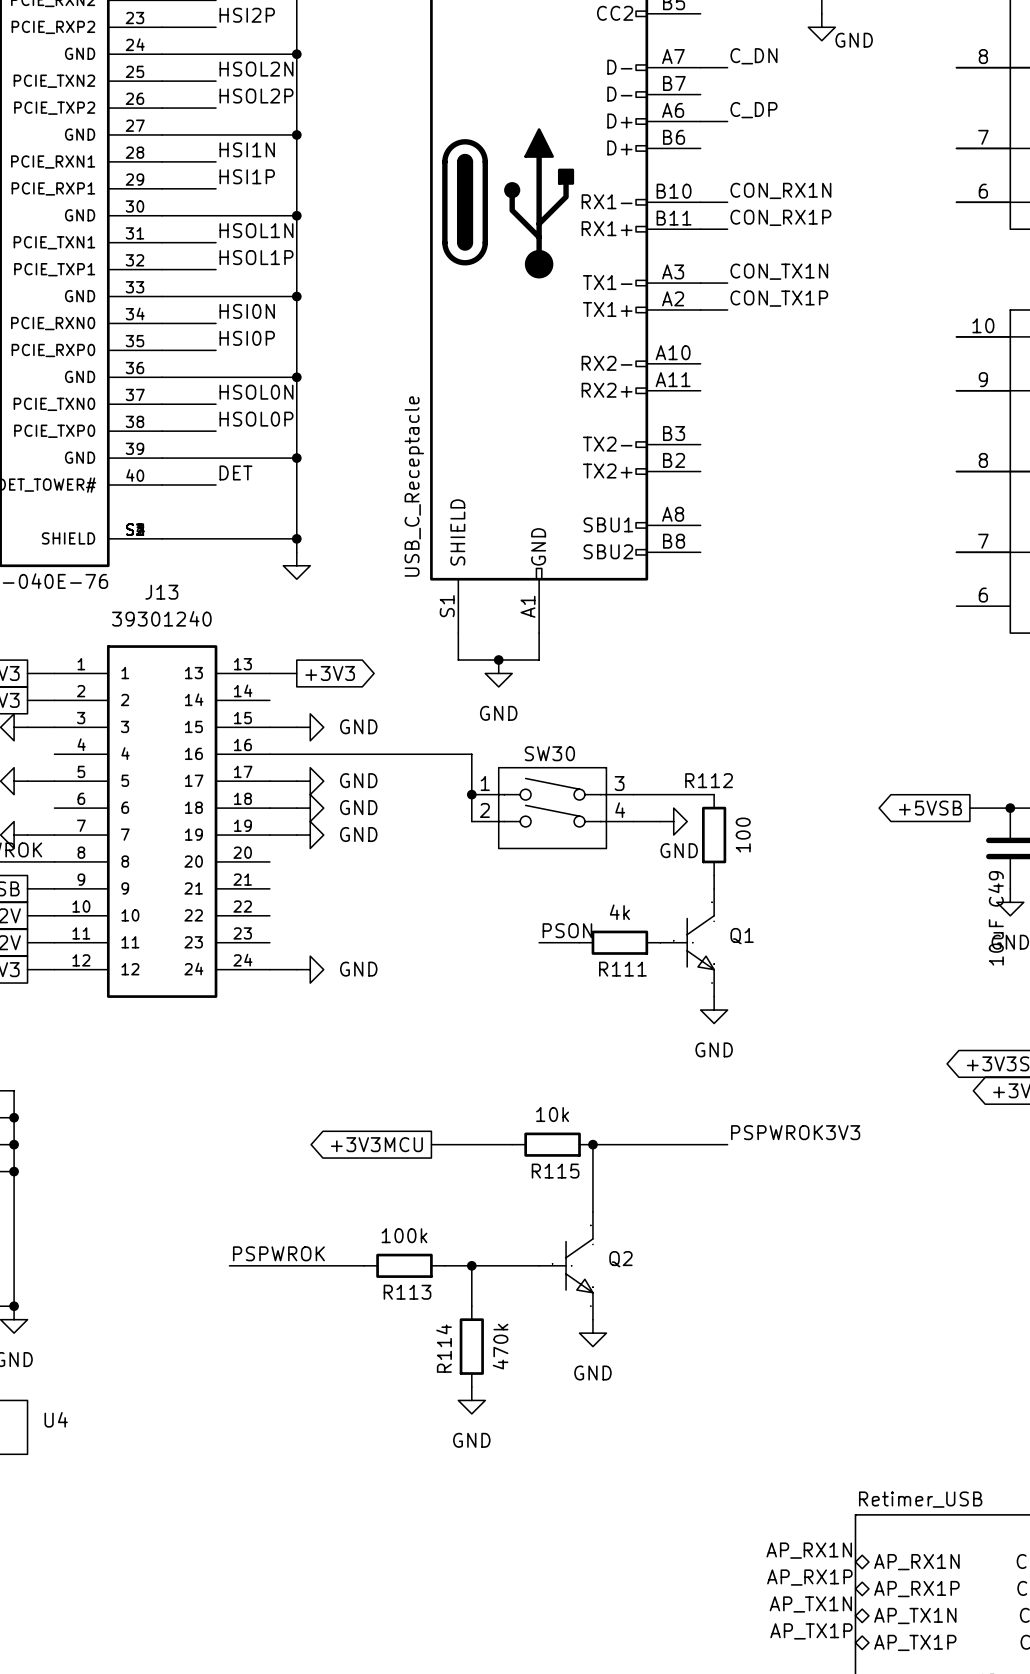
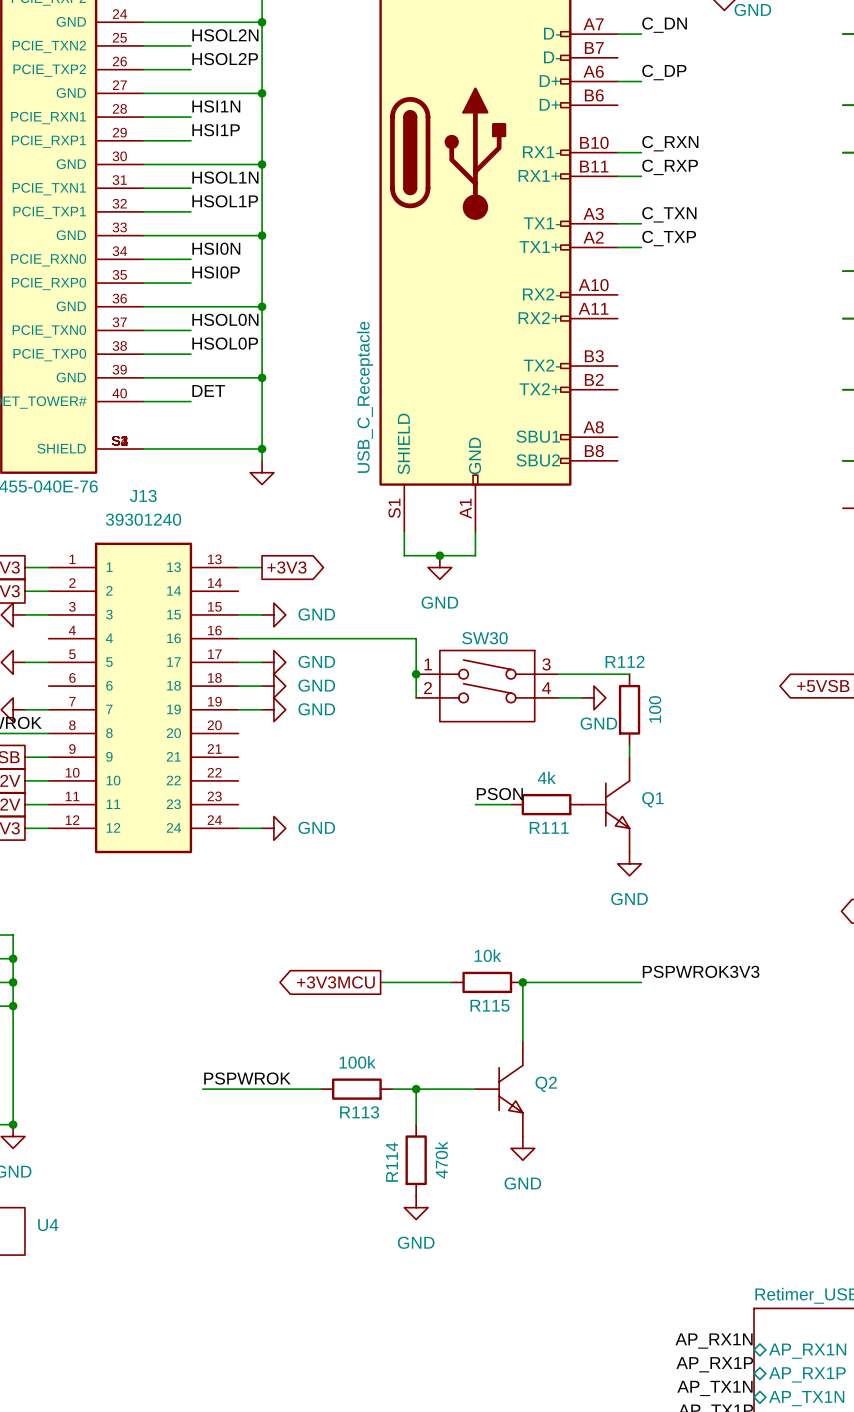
label: CON_RX1N (780, 190) -> C_RXN (670, 143)
label: CON_RX1P (780, 217) -> C_RXP (670, 167)
label: CON_TX1N (779, 271) -> C_TXN (669, 214)
label: CON_TX1P (779, 298) -> C_TXP (669, 238)

